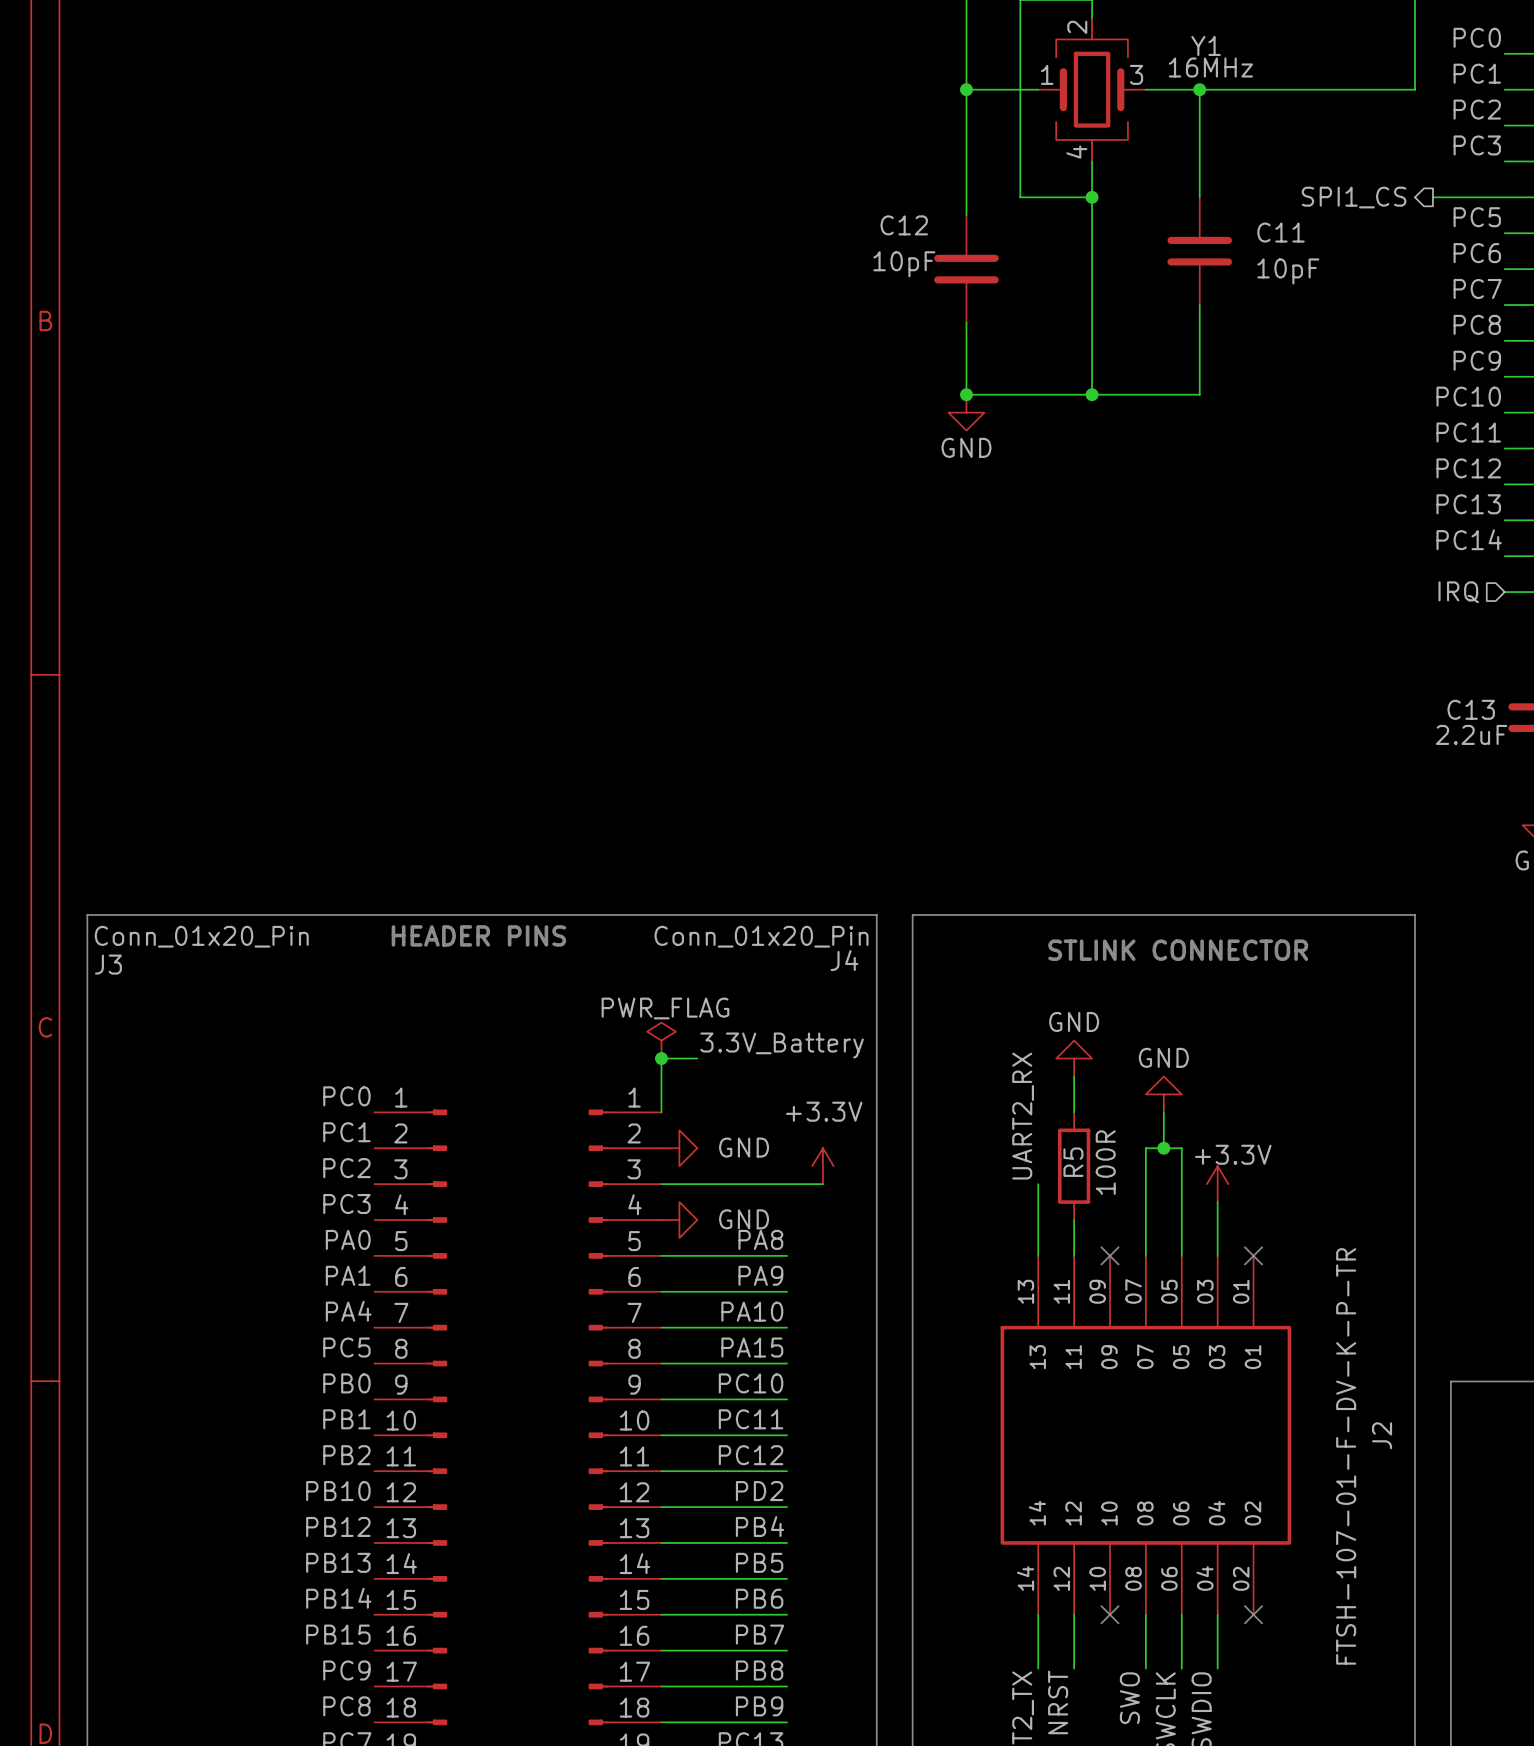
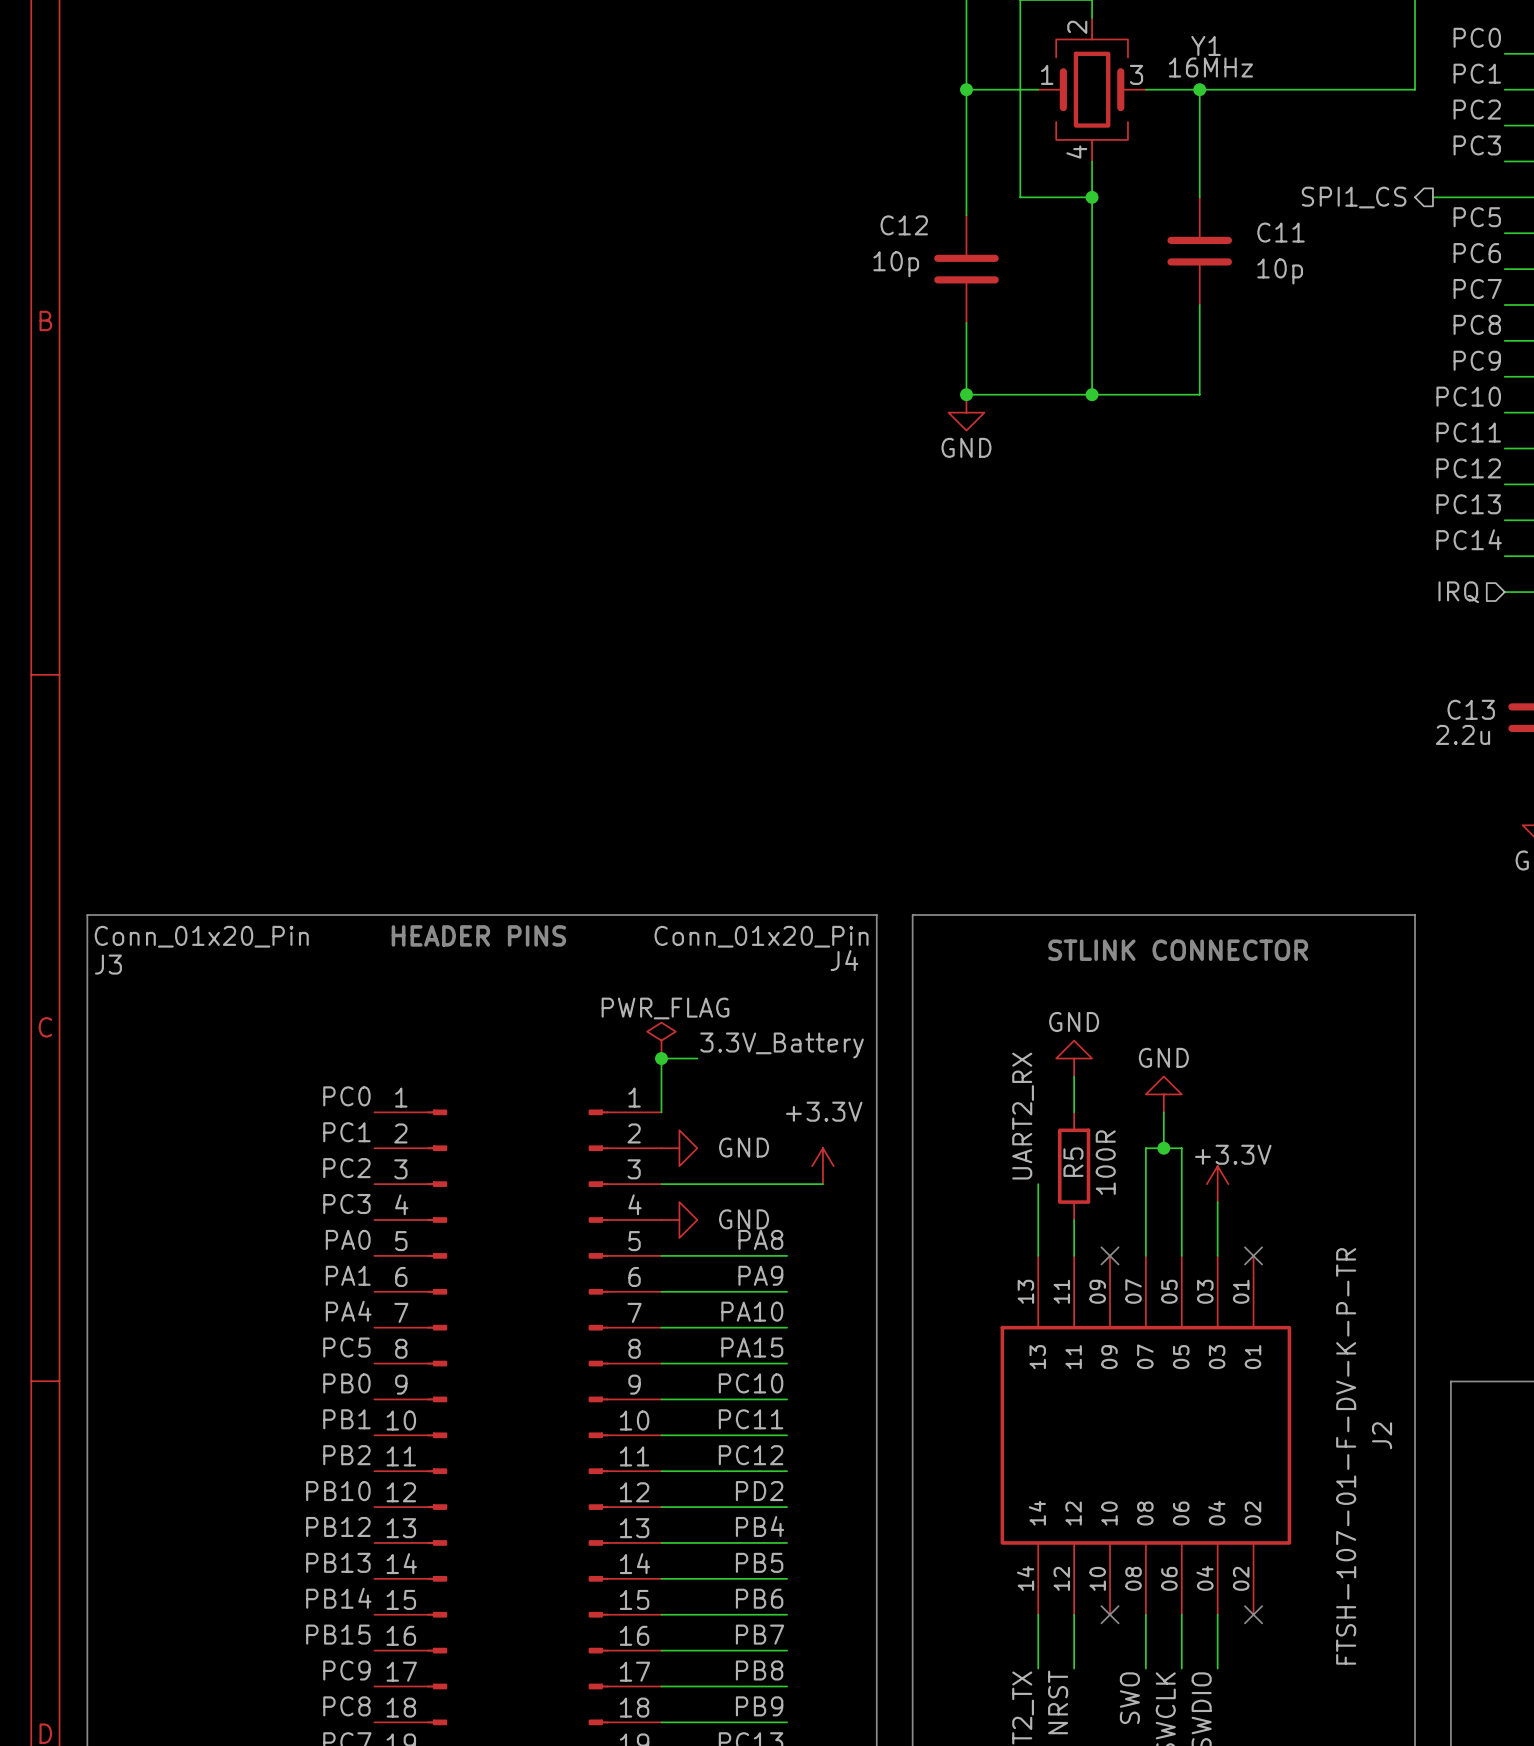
C12 value: 10pF (904, 264) -> 10p (896, 264)
C11 value: 10pF (1288, 271) -> 10p (1280, 271)
C13 value: 2.2uF (1471, 734) -> 2.2u (1462, 734)

